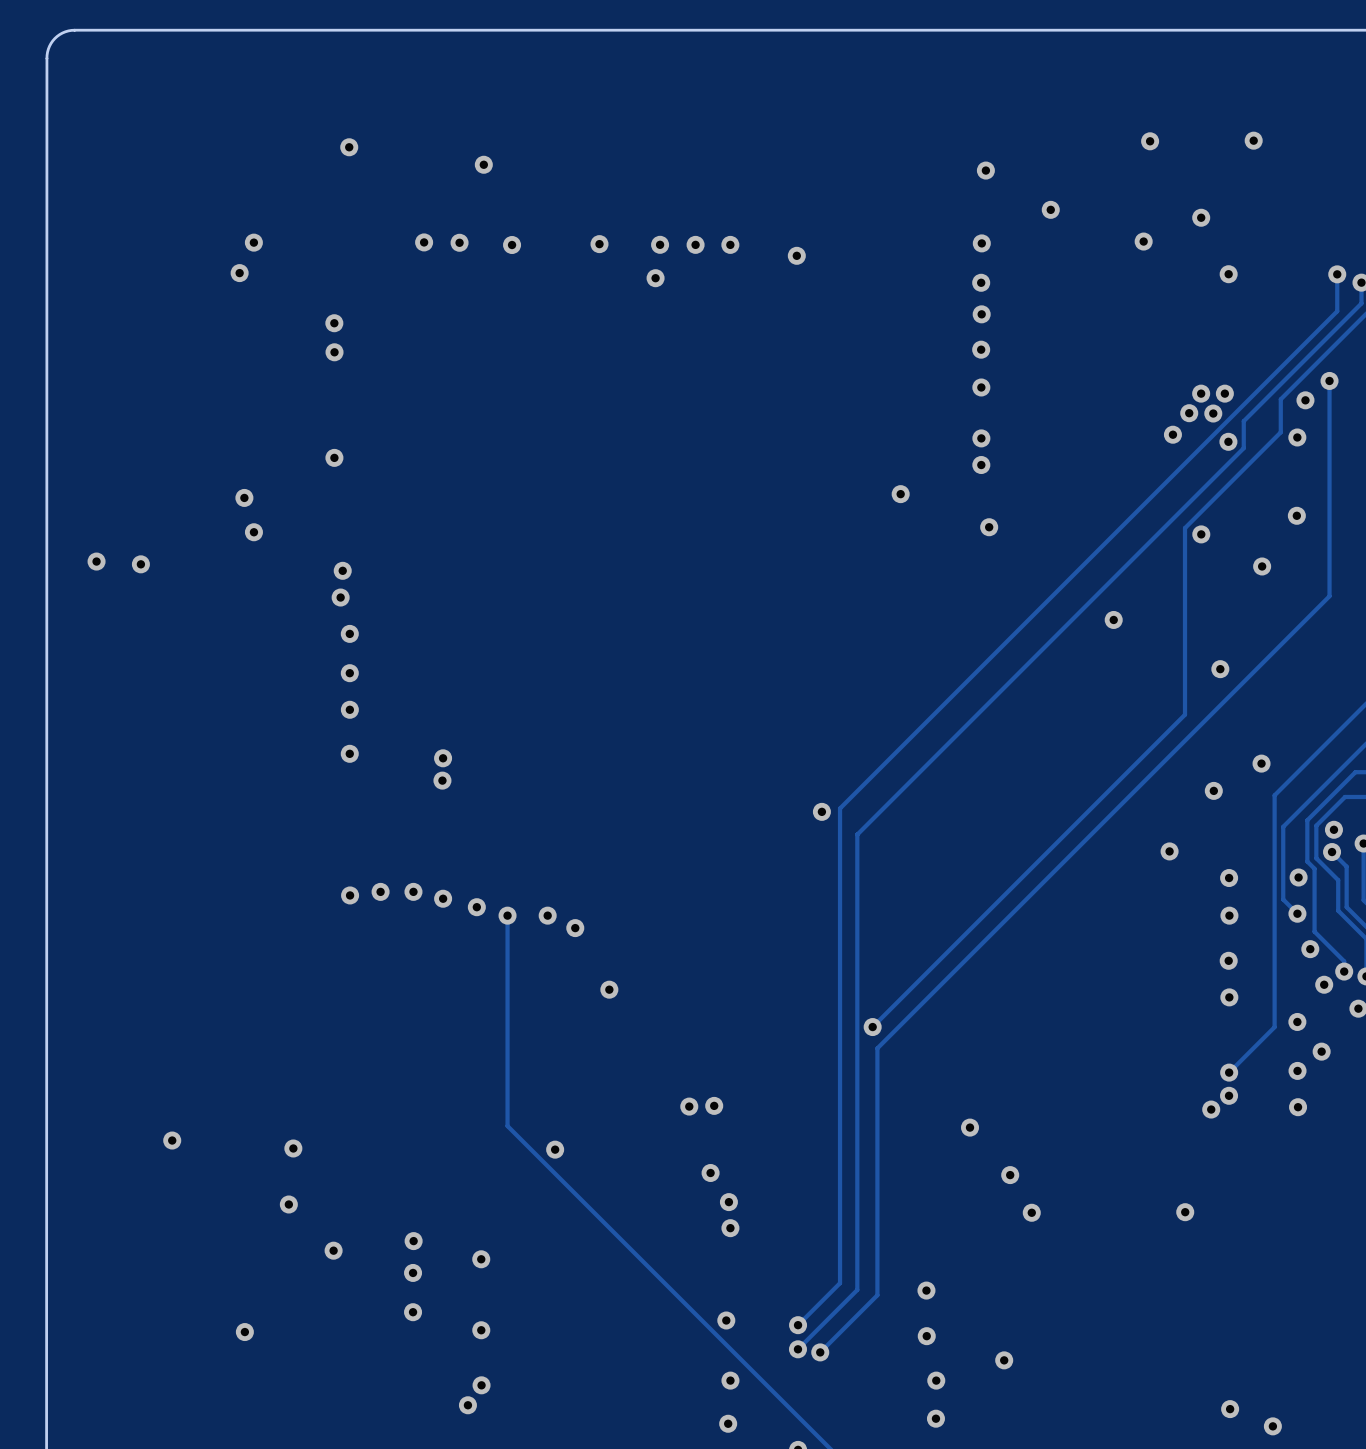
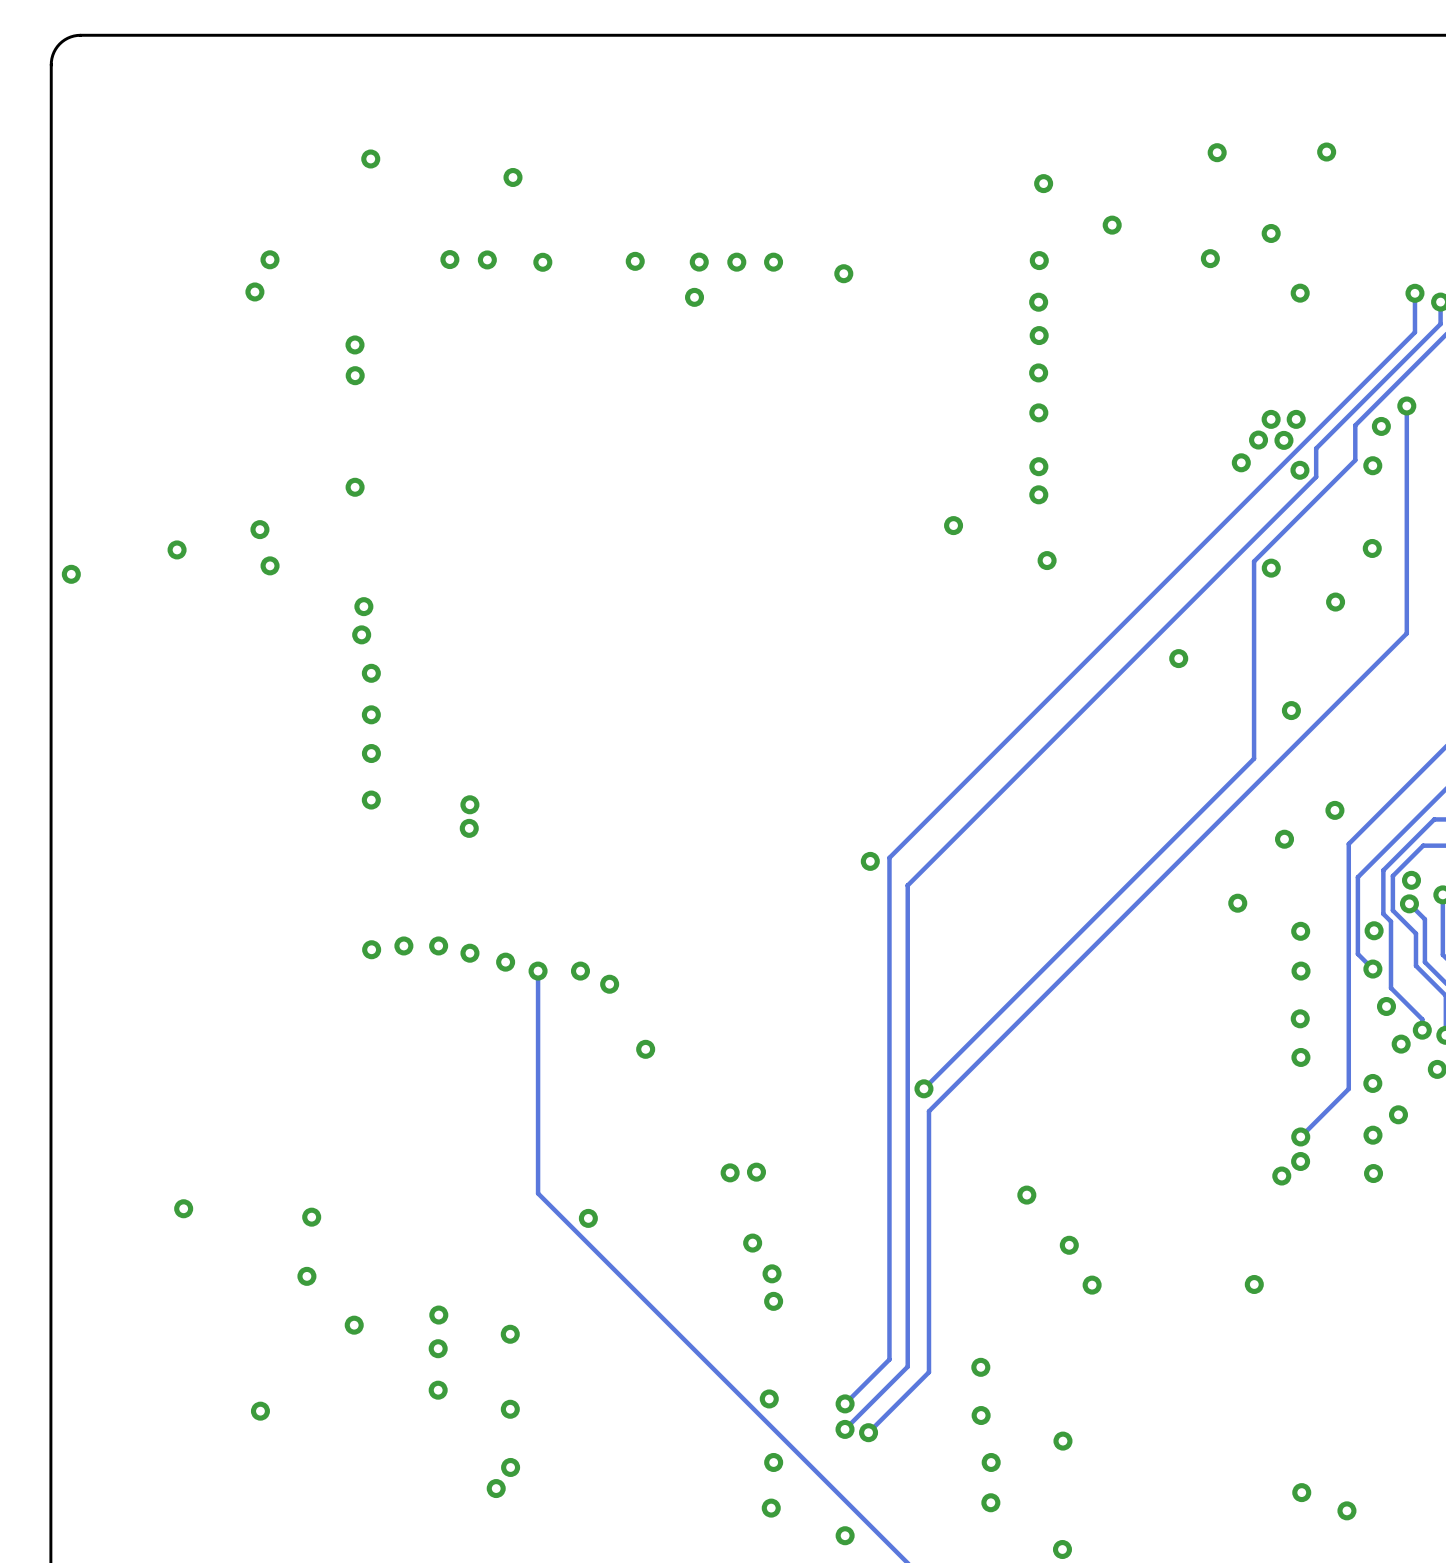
via: none -> (177, 549)
via position: (96, 561) -> (71, 574)
via: (140, 564) -> none

